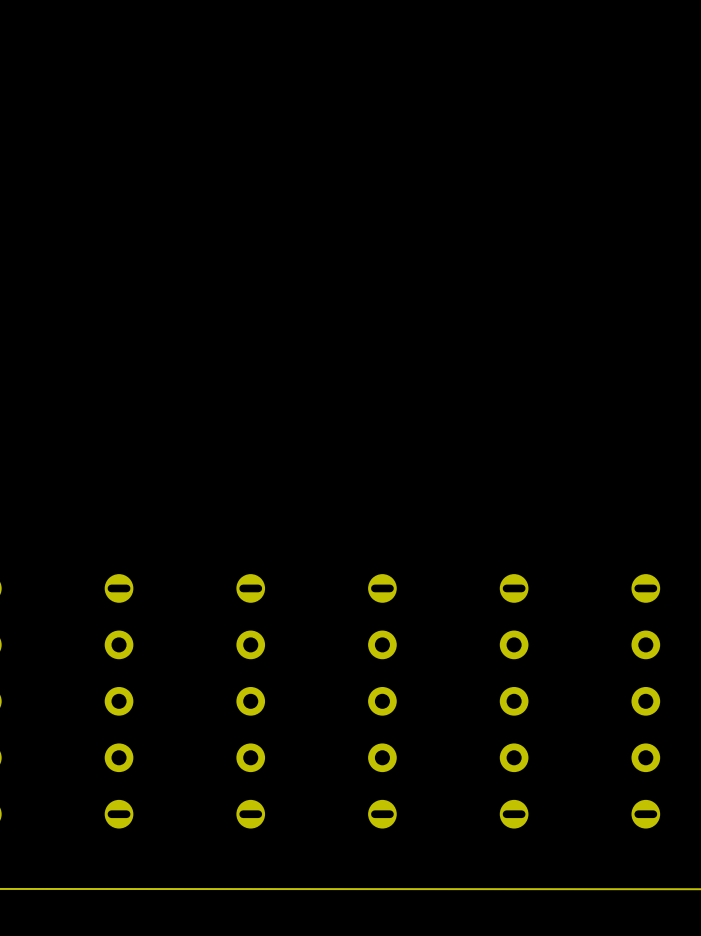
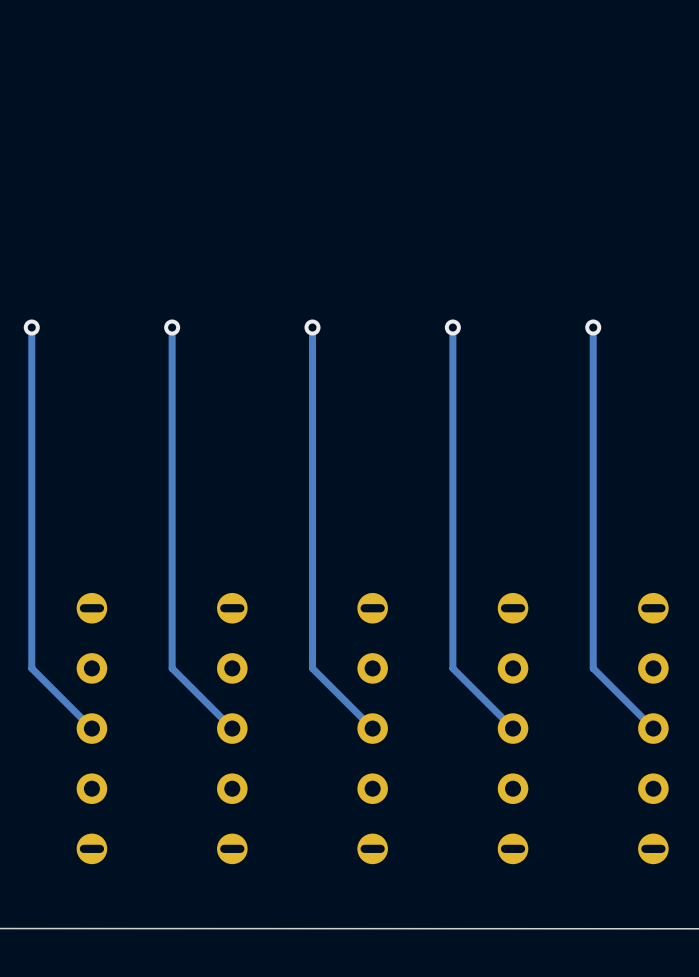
track: none -> (31, 327) (31, 668) (91, 728)
via: none -> (31, 327)
track: none -> (172, 327) (172, 668) (232, 728)
via: none -> (172, 327)
track: none -> (312, 327) (312, 668) (372, 728)
via: none -> (312, 327)
track: none -> (452, 327) (452, 668) (513, 728)
via: none -> (452, 327)
track: none -> (593, 327) (593, 668) (653, 728)
via: none -> (593, 327)

